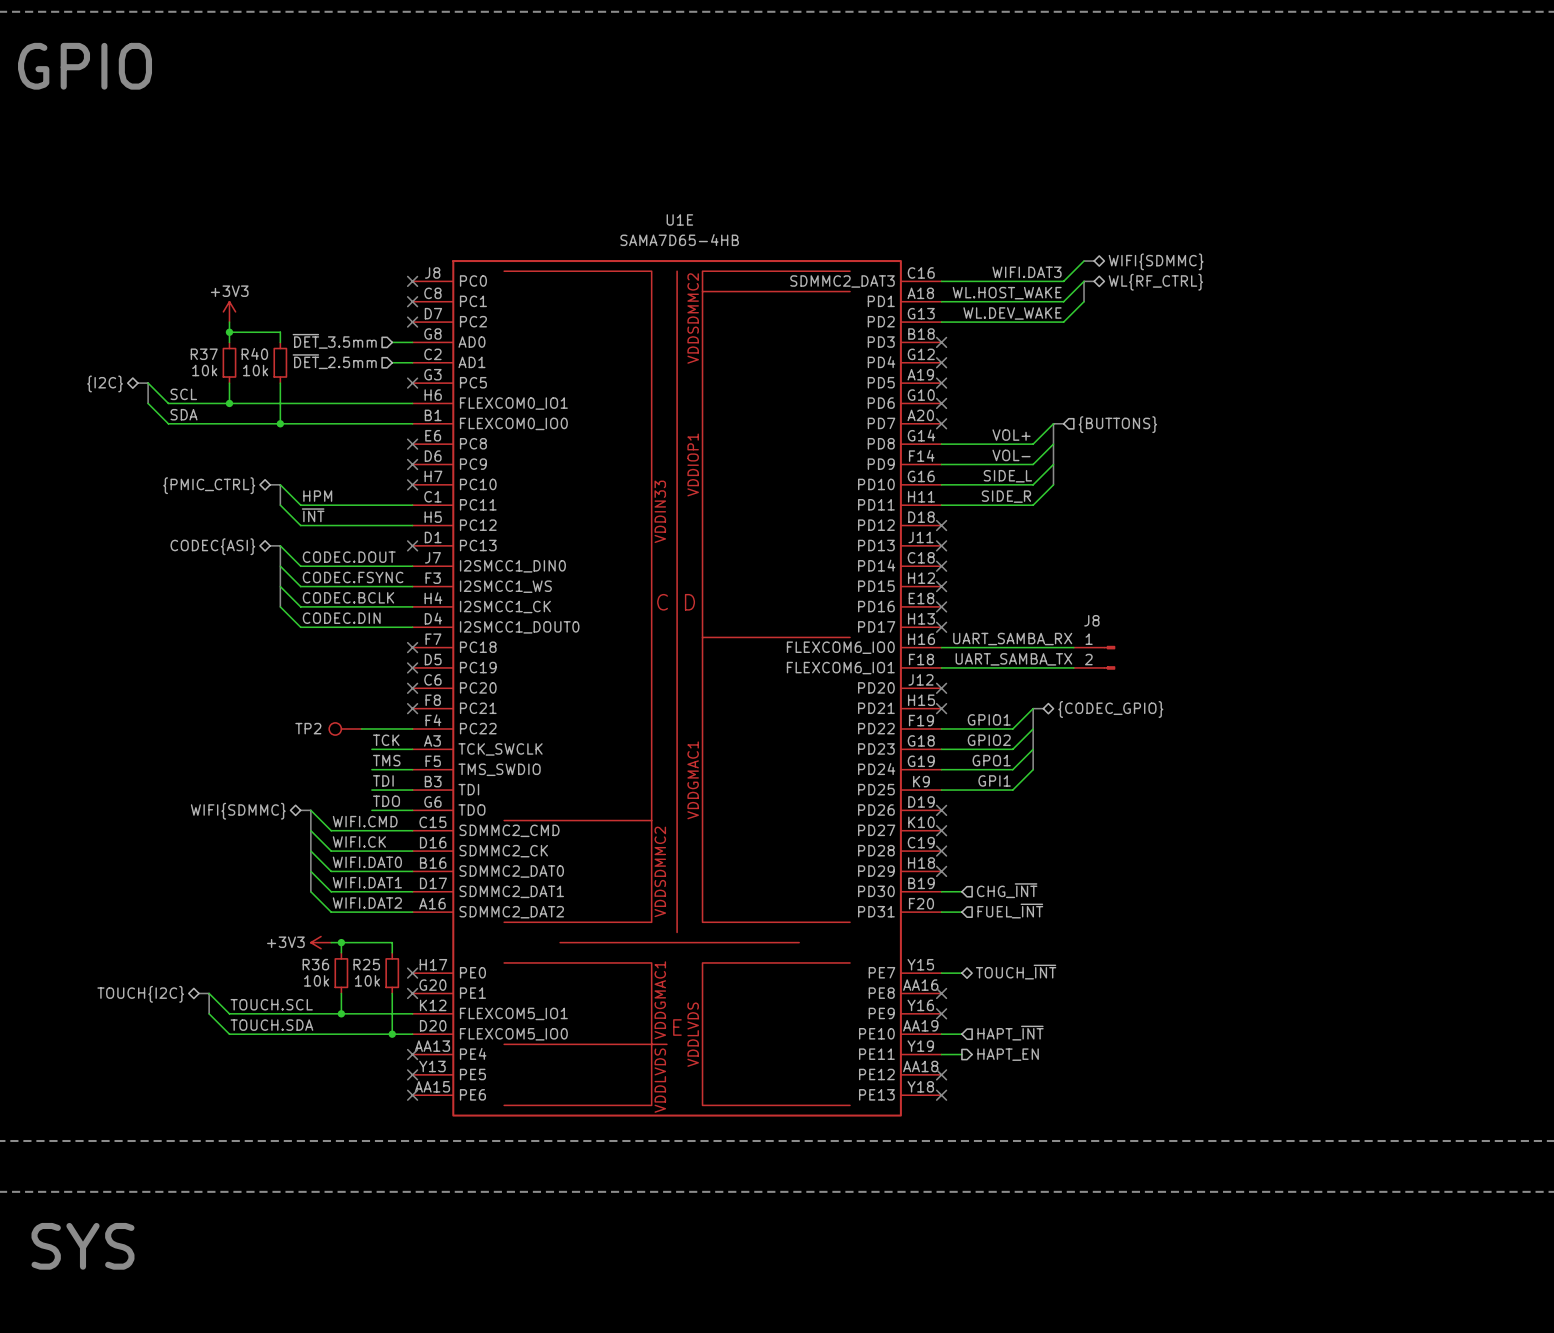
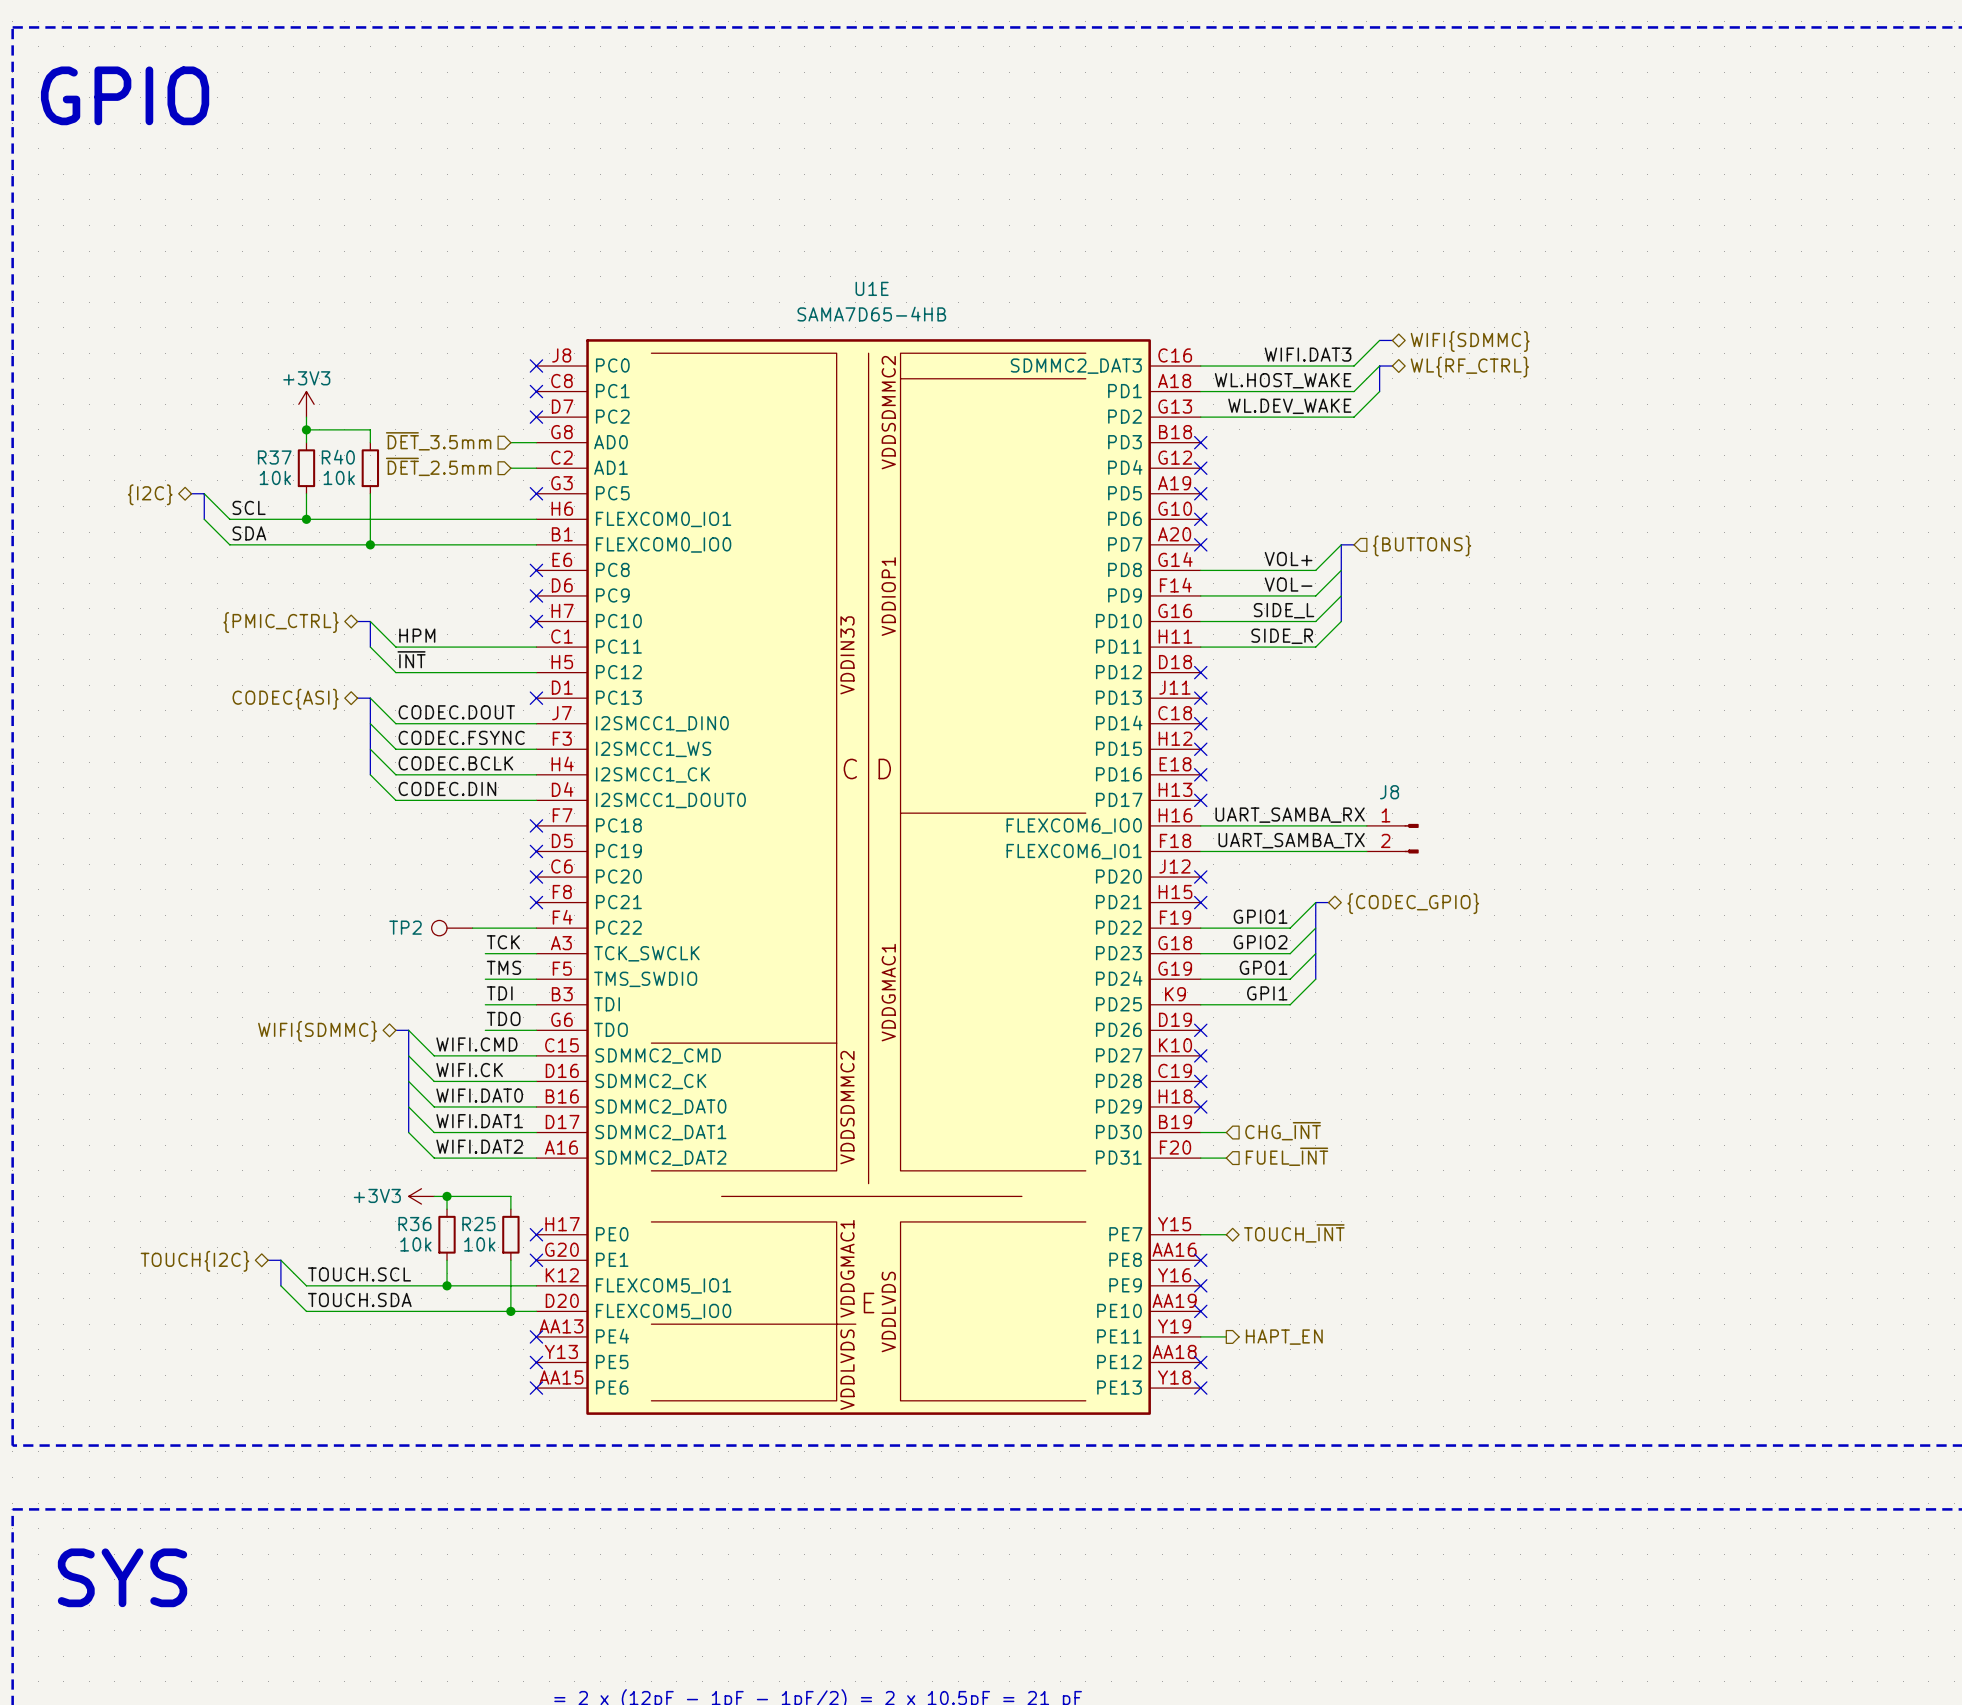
hierarchical label: HAPT_~{INT} (1010, 1033) -> none
wire: (941, 1034) (961, 1034) -> none
no-connect mark: none -> (1200, 1311)

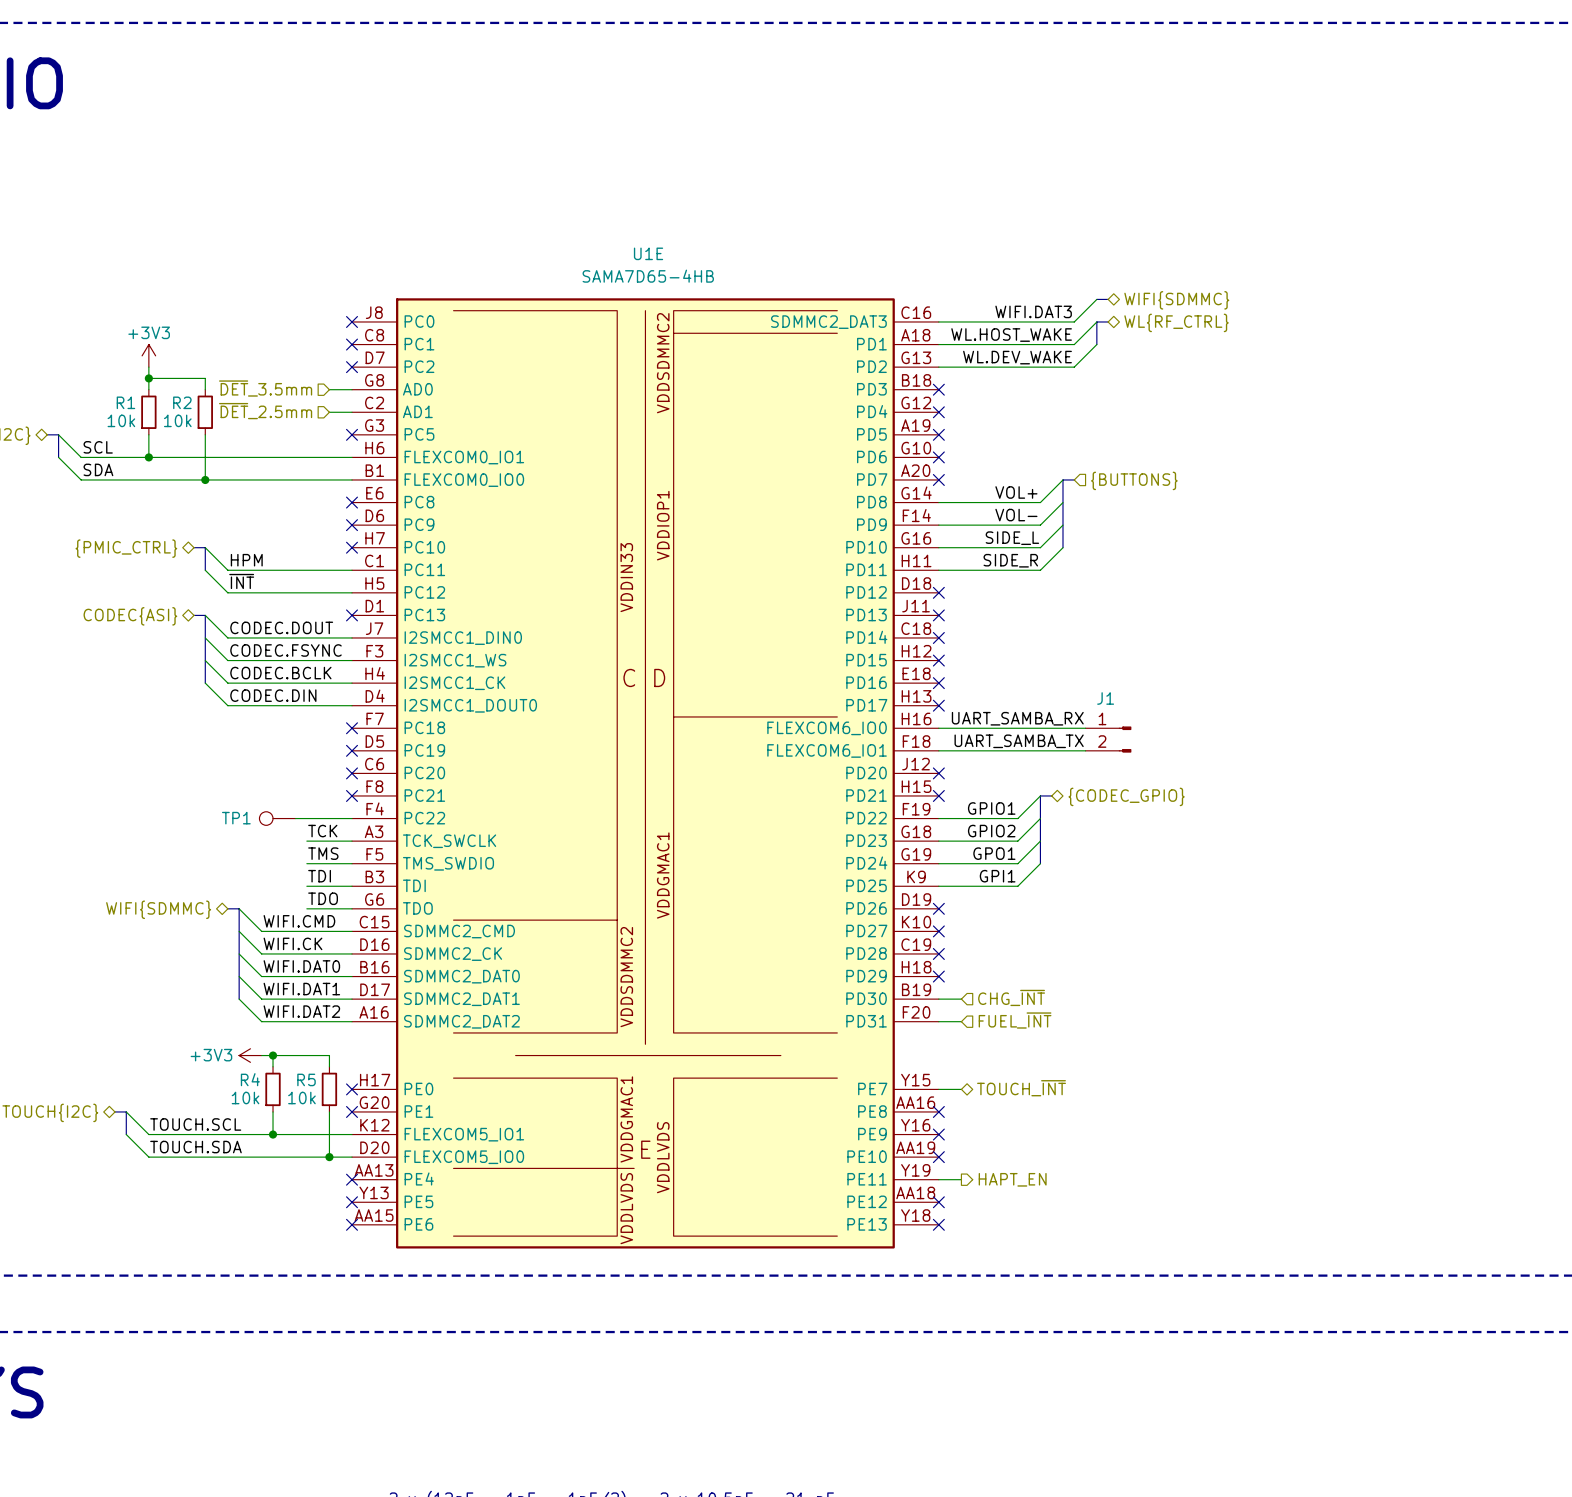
R37 name: R37 (274, 457) -> R1 (125, 402)
R40 name: R40 (338, 457) -> R2 (182, 402)
J8 name: J8 (1389, 792) -> J1 (1105, 698)
TP2 name: TP2 (405, 927) -> TP1 (236, 818)
R36 name: R36 (414, 1224) -> R4 (250, 1079)
R25 name: R25 (478, 1224) -> R5 (306, 1079)

